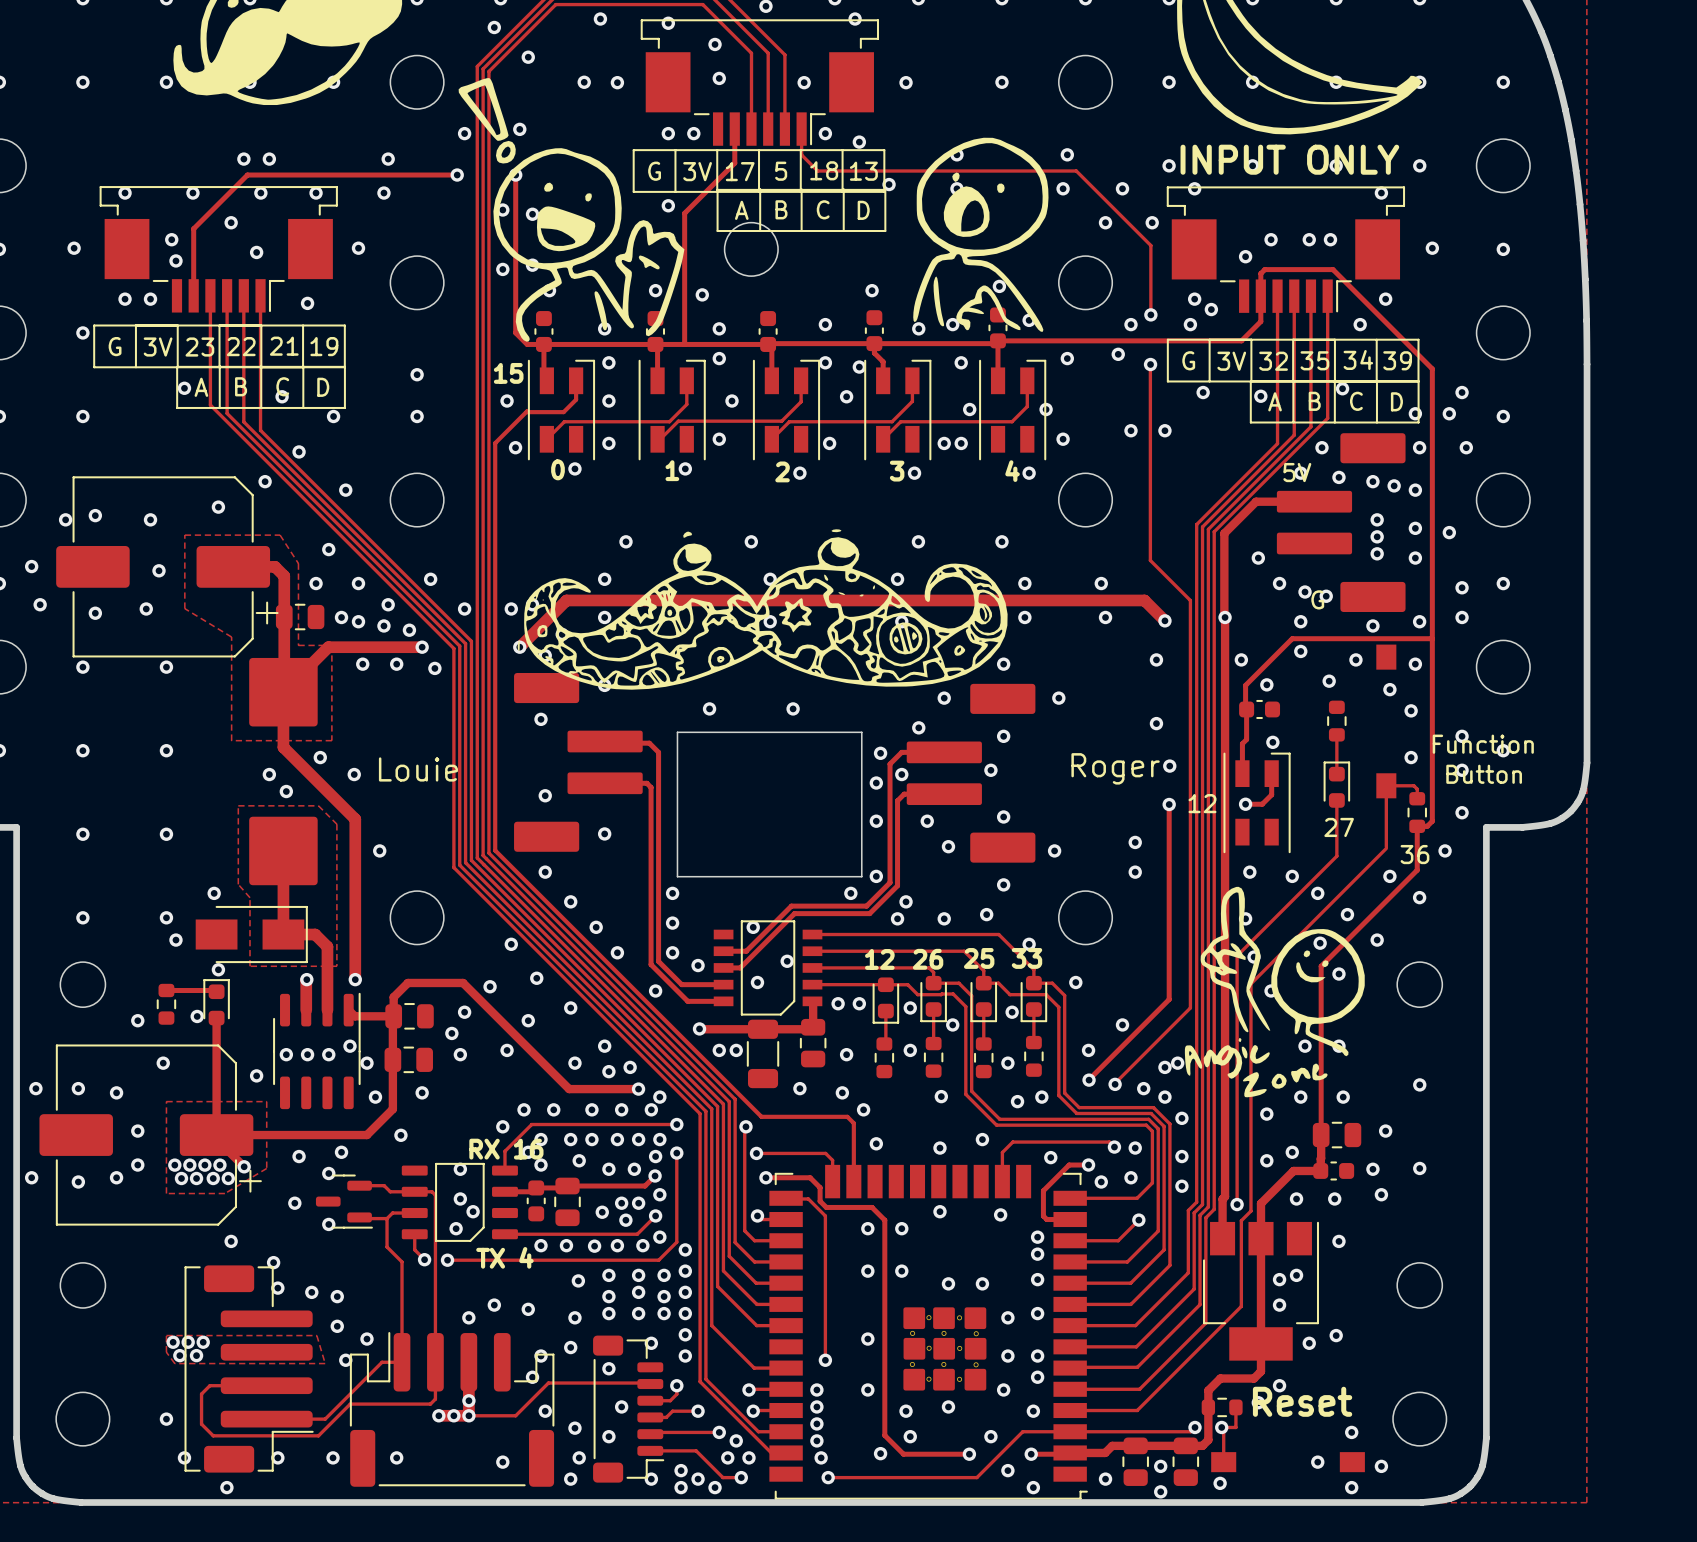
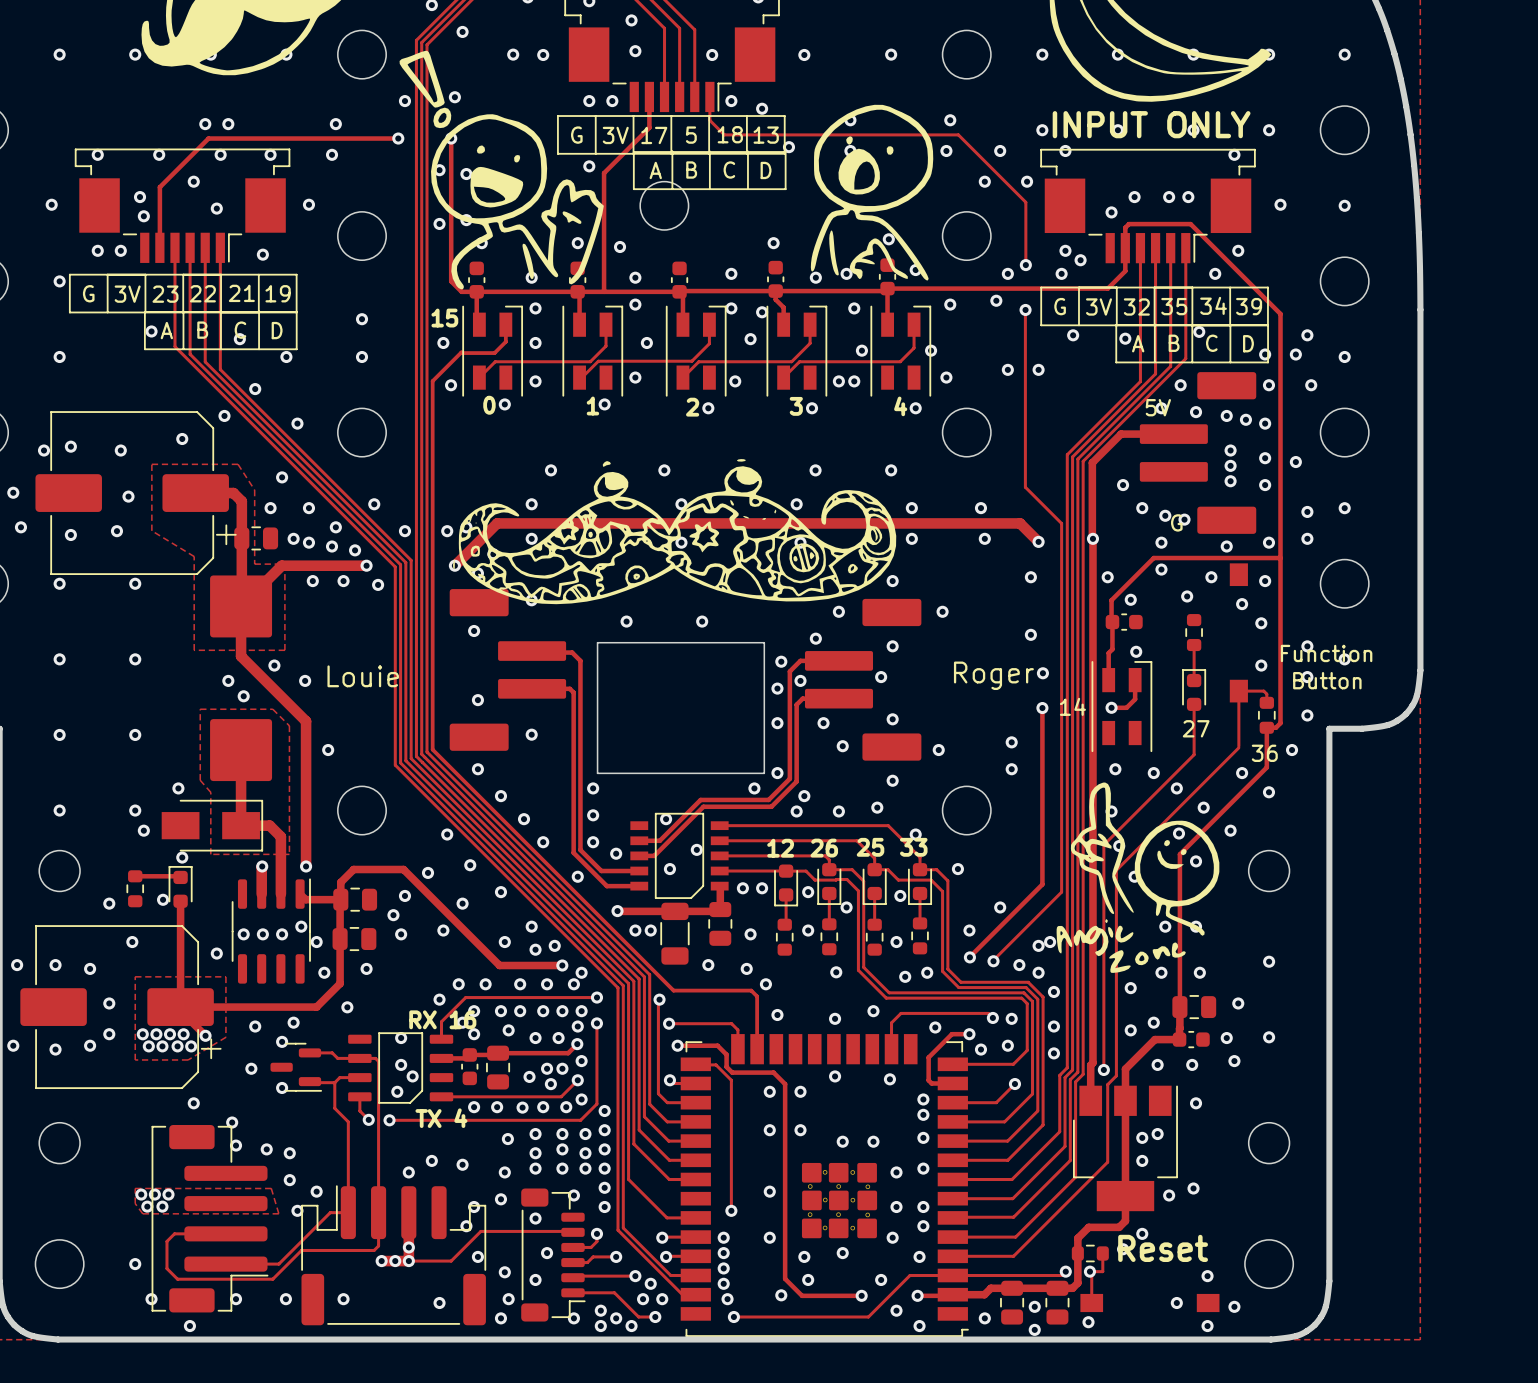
text: 12 (1202, 803) -> 14 (1072, 706)

